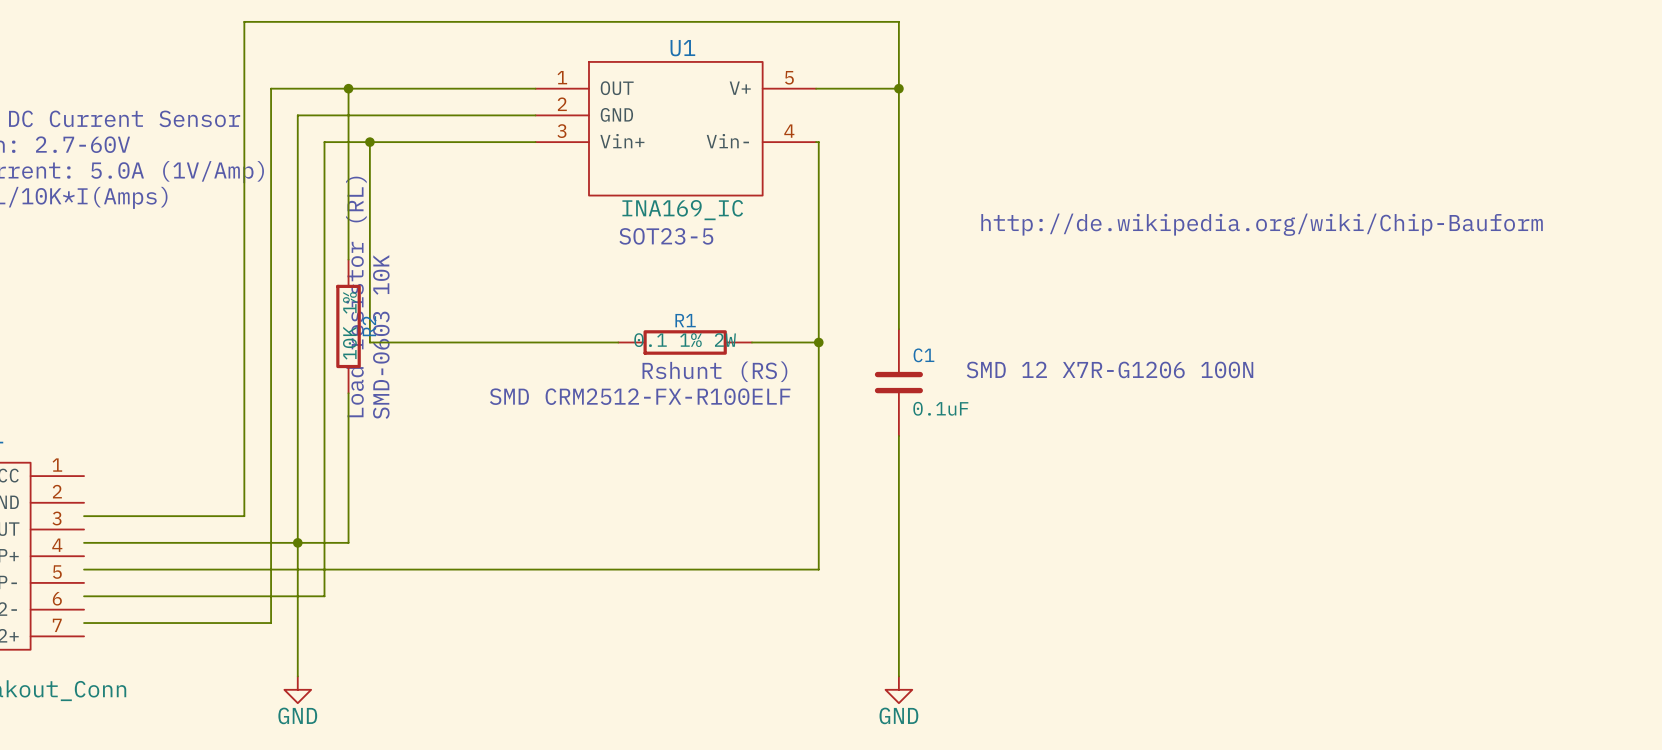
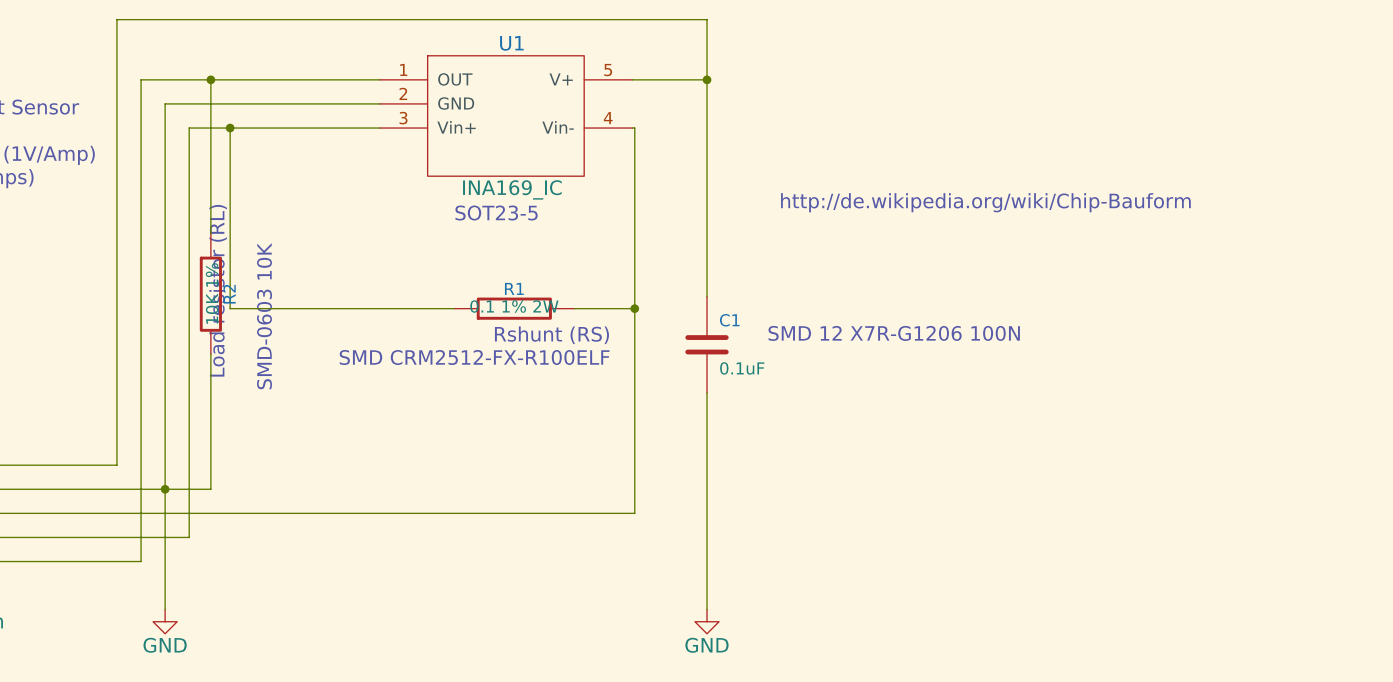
text position: SMD-0603 10K (381, 337) -> SMD-0603 10K (264, 316)

